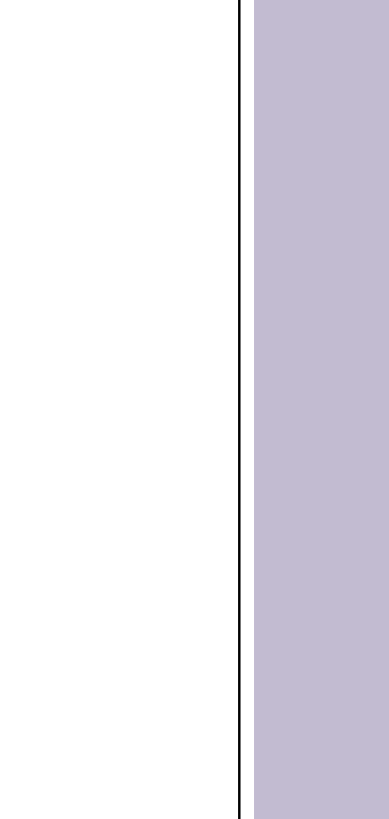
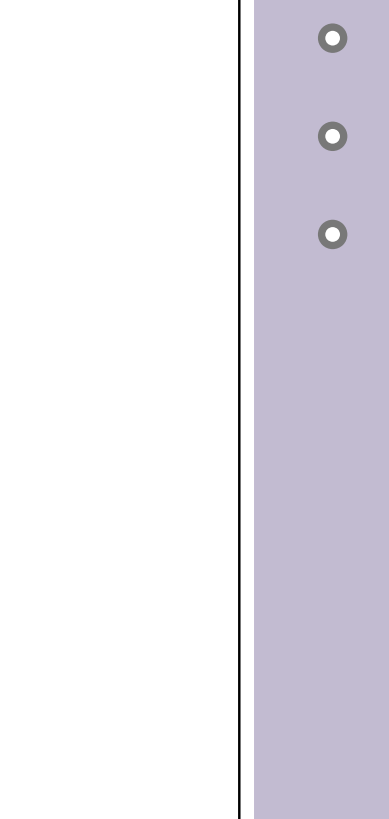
via: none -> (332, 38)
via: none -> (332, 136)
via: none -> (332, 234)

